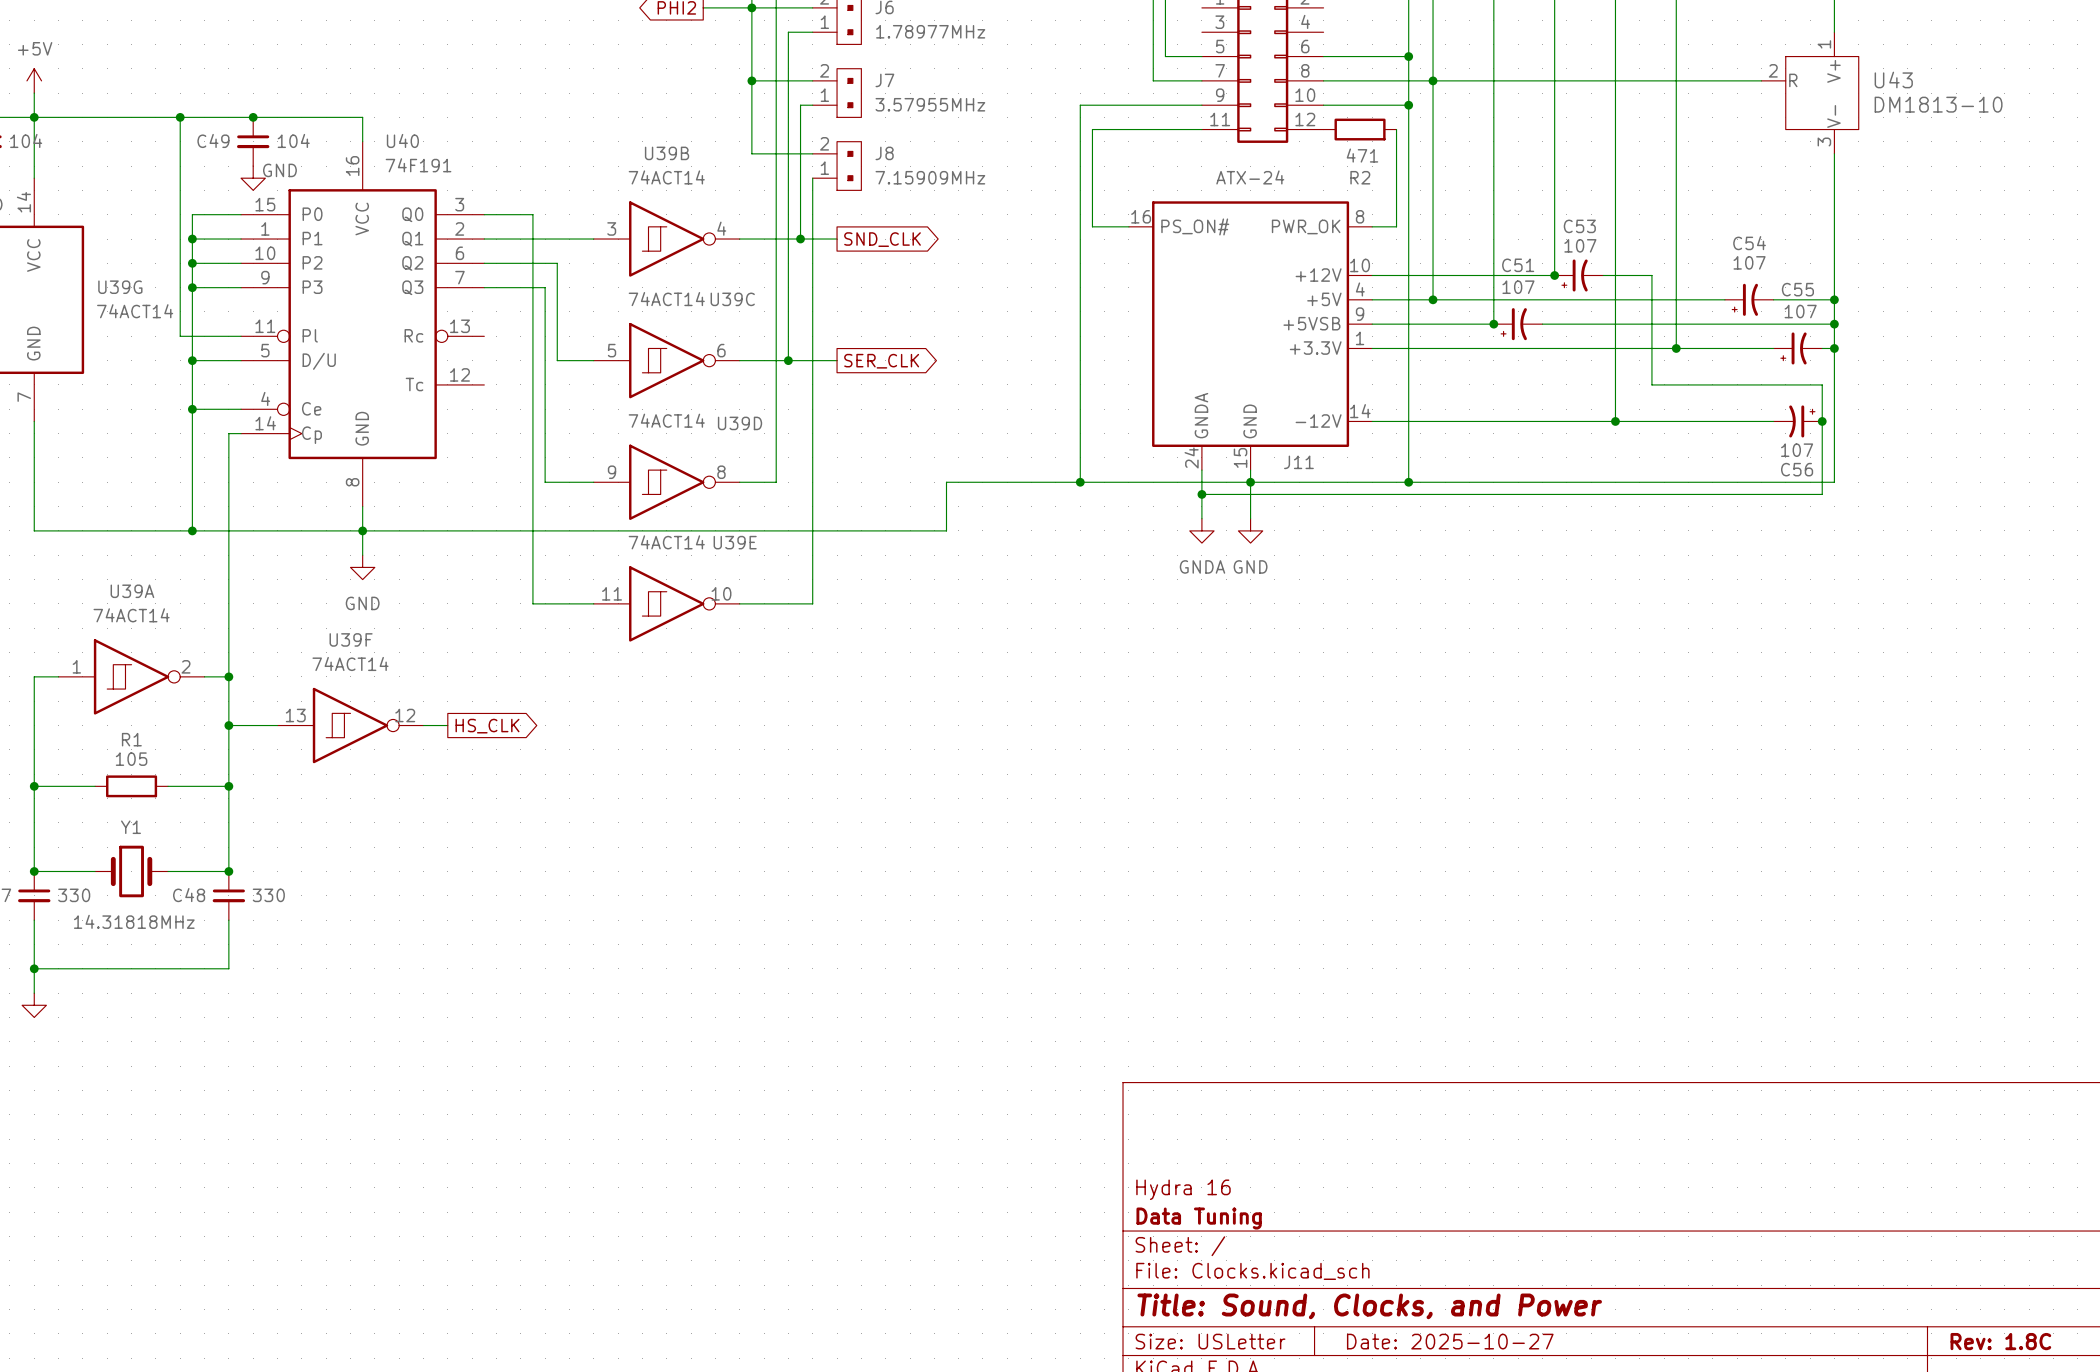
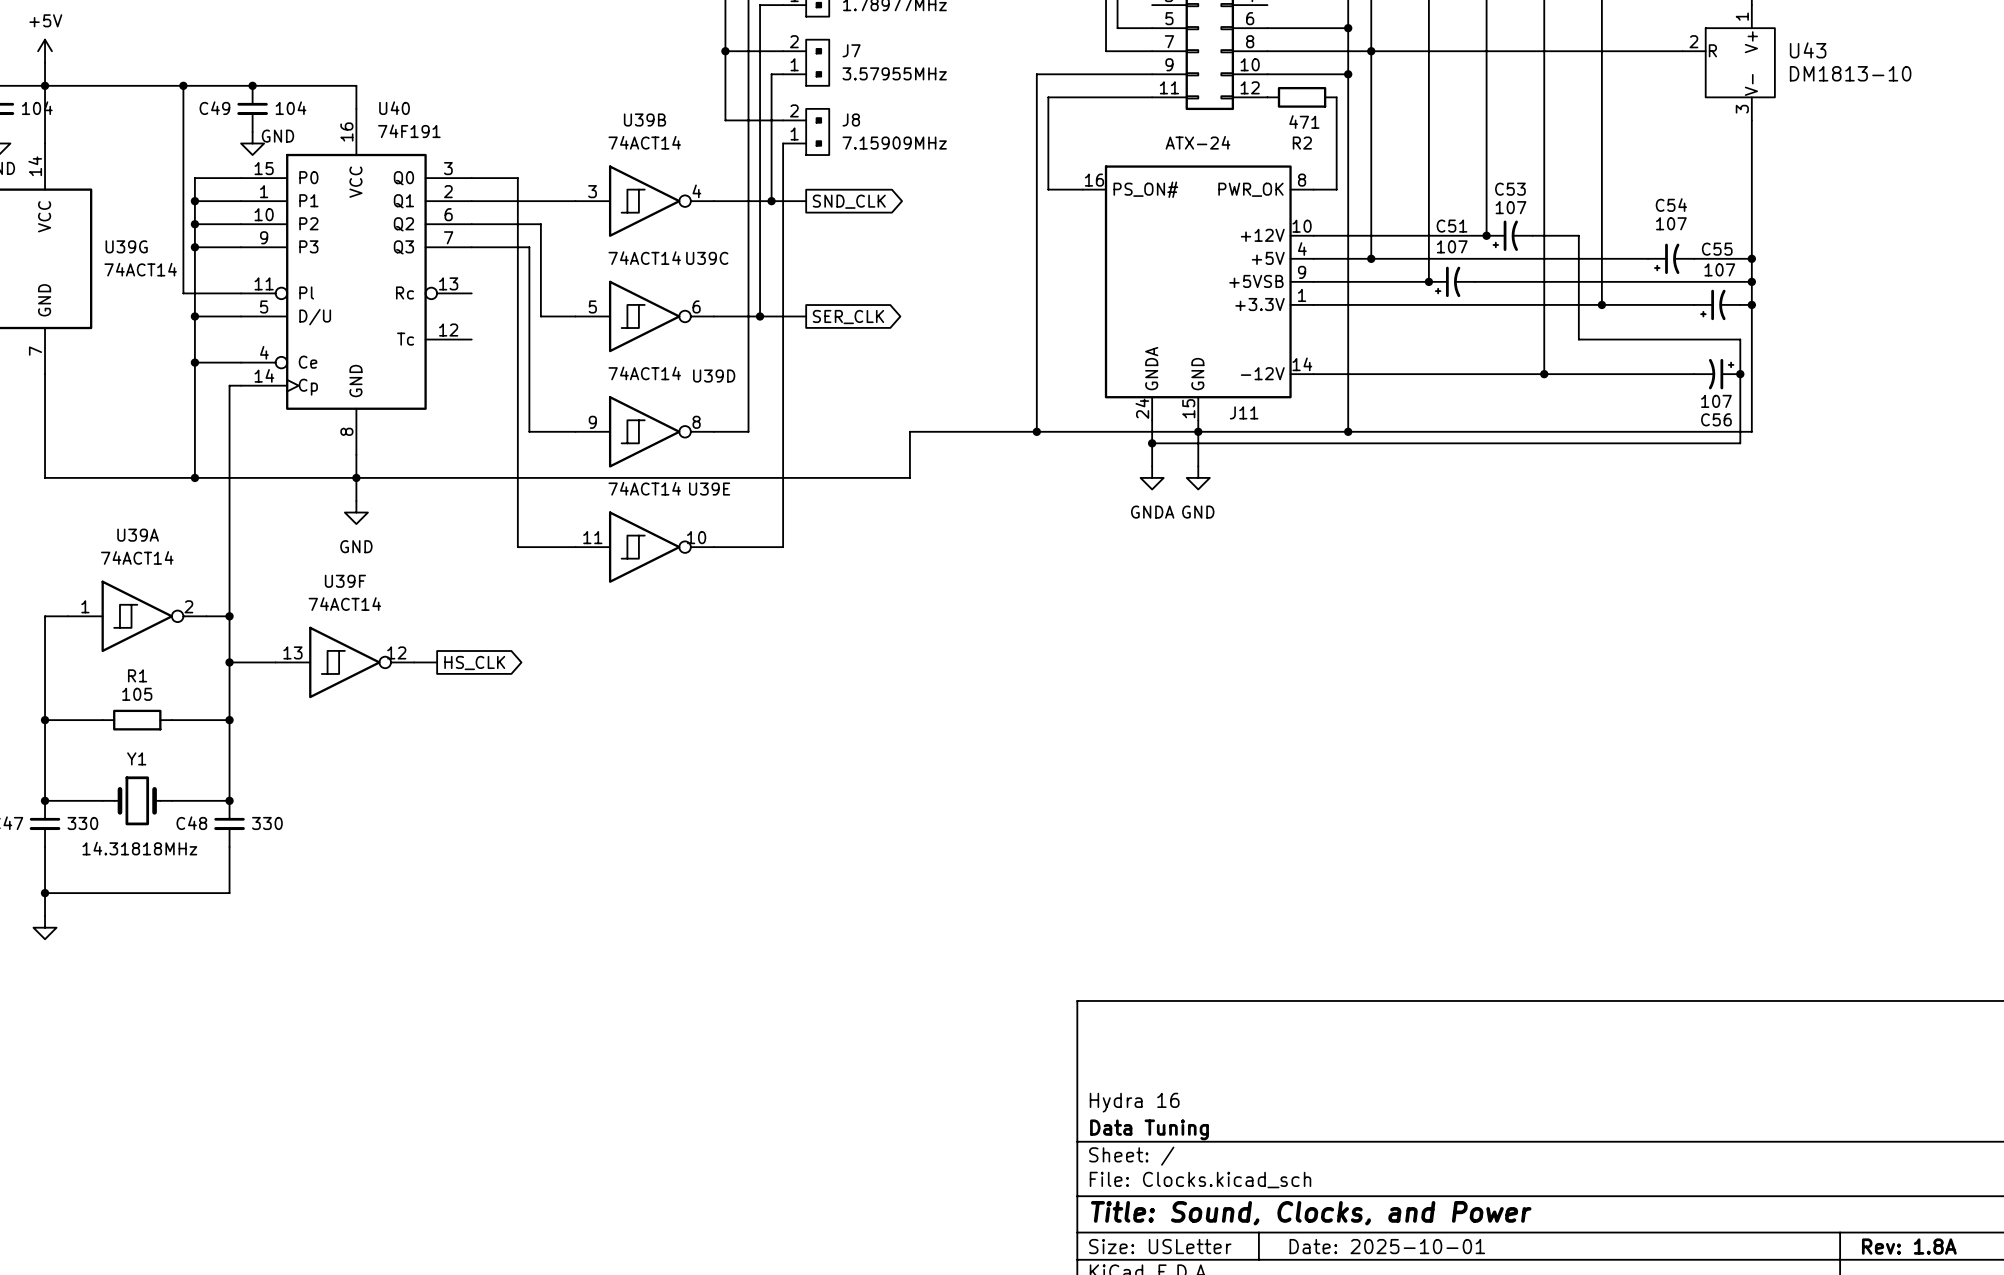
title block: Date: 2025-10-27 (1450, 1341) -> Date: 2025-10-01 (1387, 1246)
title block: Rev: 1.8C (2000, 1341) -> Rev: 1.8A (1909, 1246)

